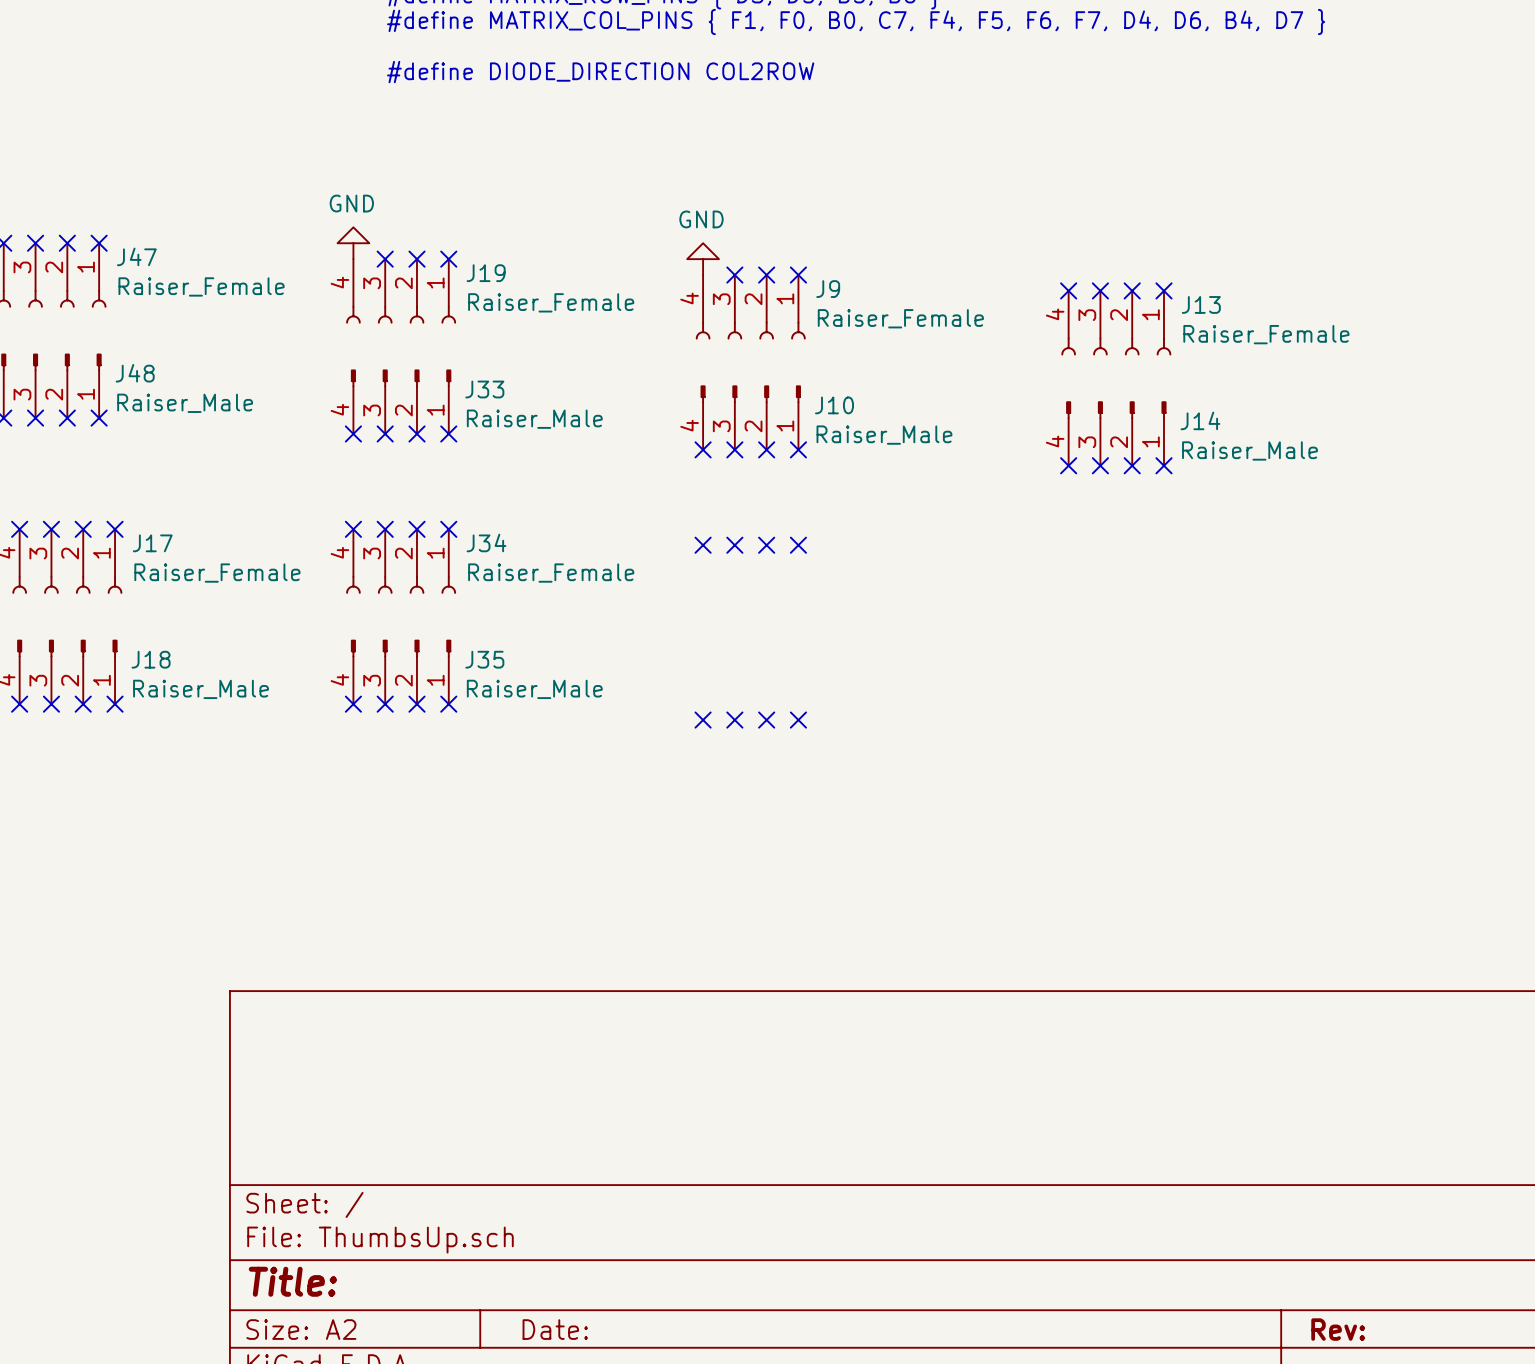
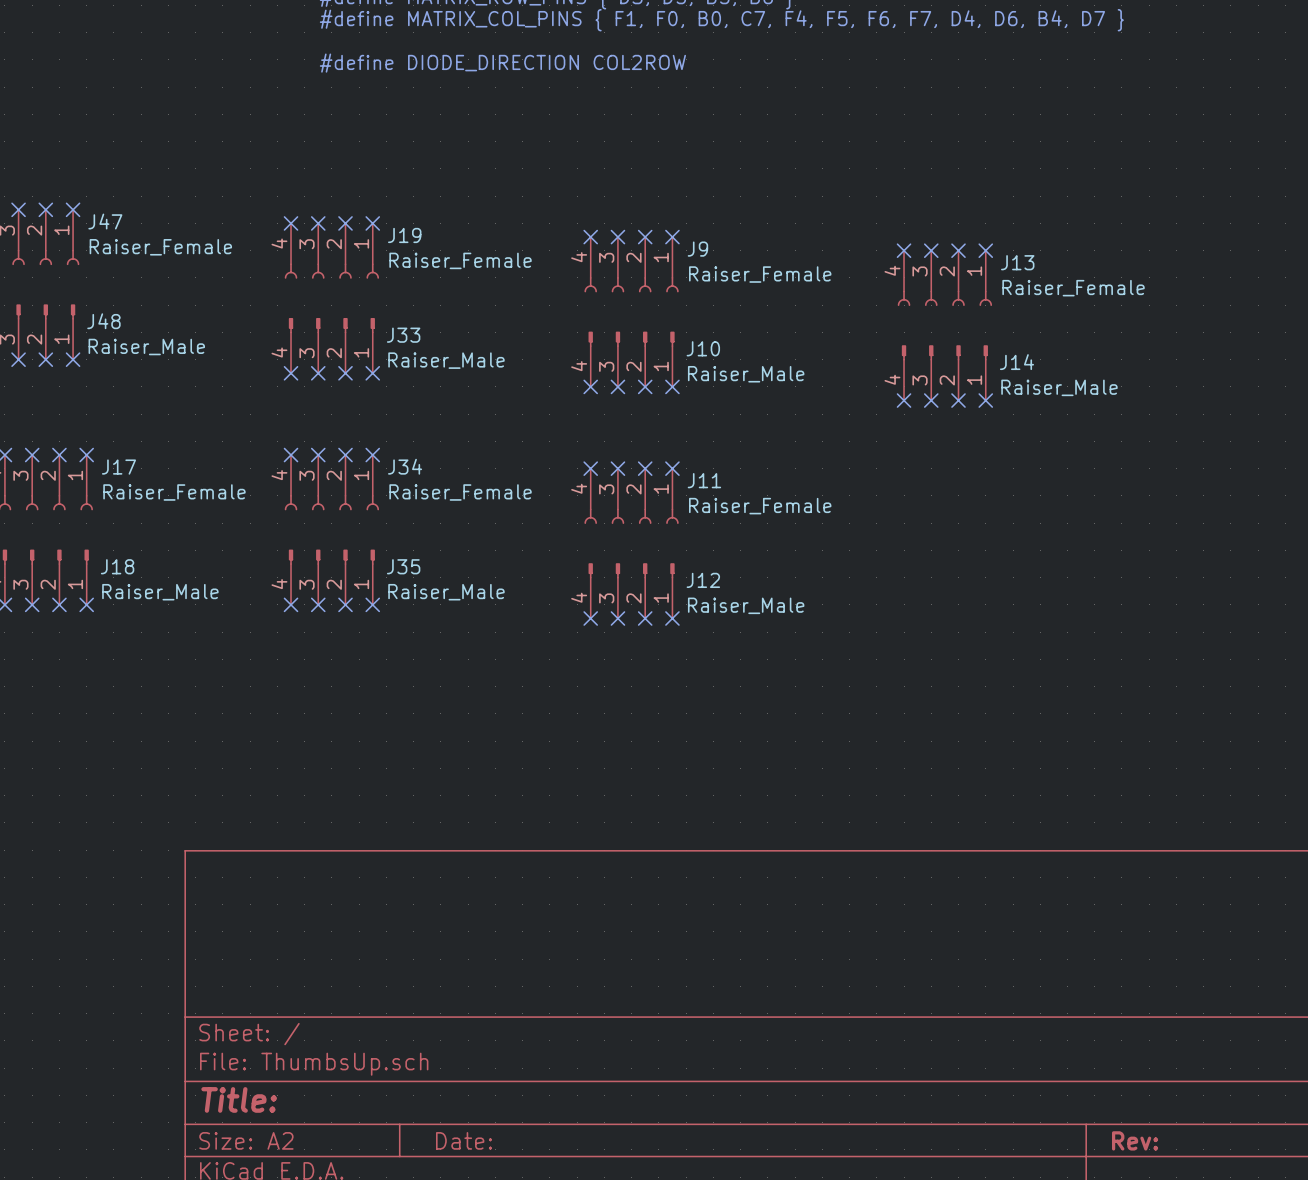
power symbol: GND (353, 243) -> none
no-connect mark: none -> (291, 223)
power symbol: GND (703, 259) -> none
no-connect mark: none -> (590, 237)
J11: none -> Raiser_Female (631, 496)
J12: none -> Raiser_Male (631, 590)

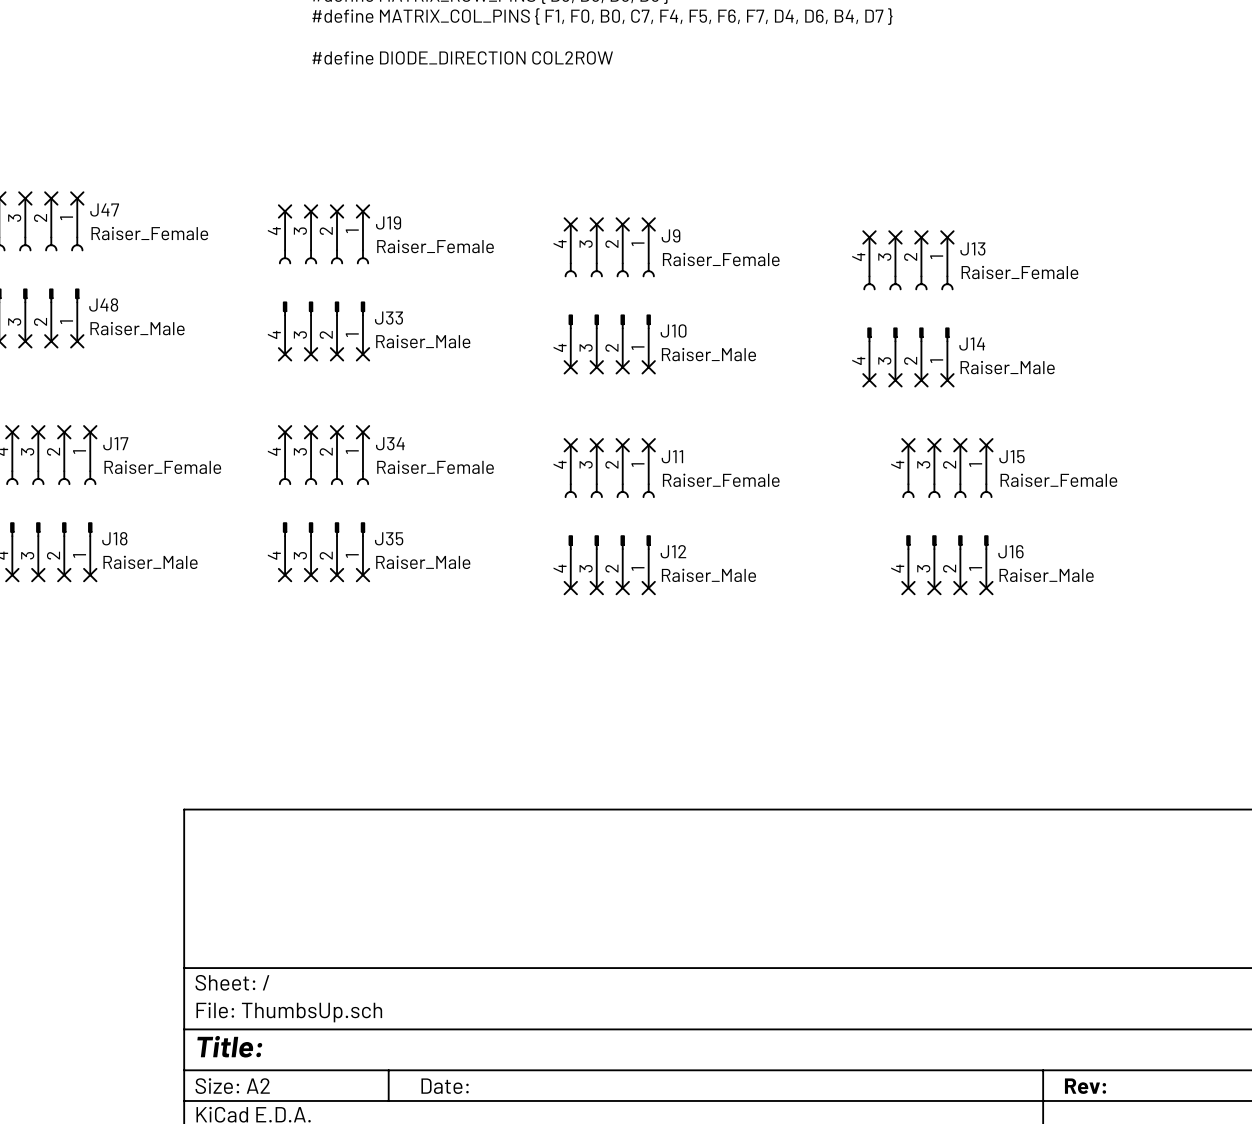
no-connect mark: none -> (908, 445)
no-connect mark: none -> (934, 445)
no-connect mark: none -> (960, 445)
no-connect mark: none -> (986, 445)
J15: none -> Raiser_Female (947, 471)
J16: none -> Raiser_Male (947, 561)
no-connect mark: none -> (908, 588)
no-connect mark: none -> (934, 588)
no-connect mark: none -> (960, 588)
no-connect mark: none -> (986, 588)

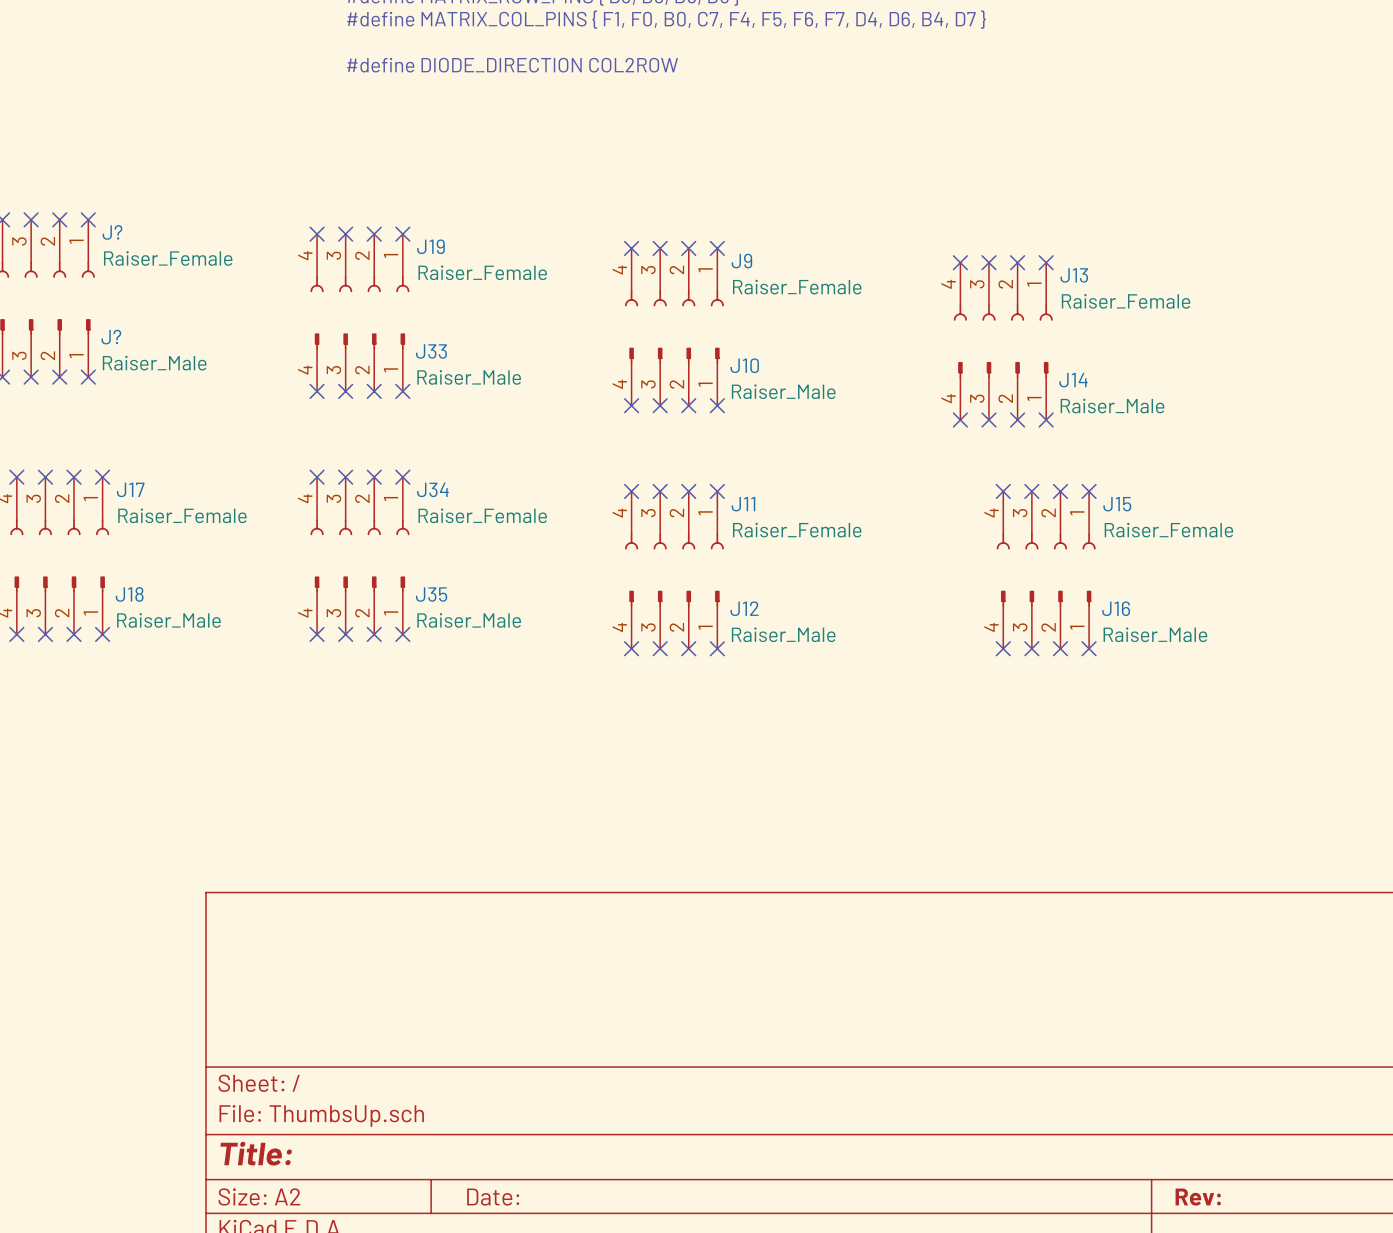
J47 name: J47 (104, 210) -> J? (112, 232)
J48 name: J48 (103, 304) -> J? (111, 337)

